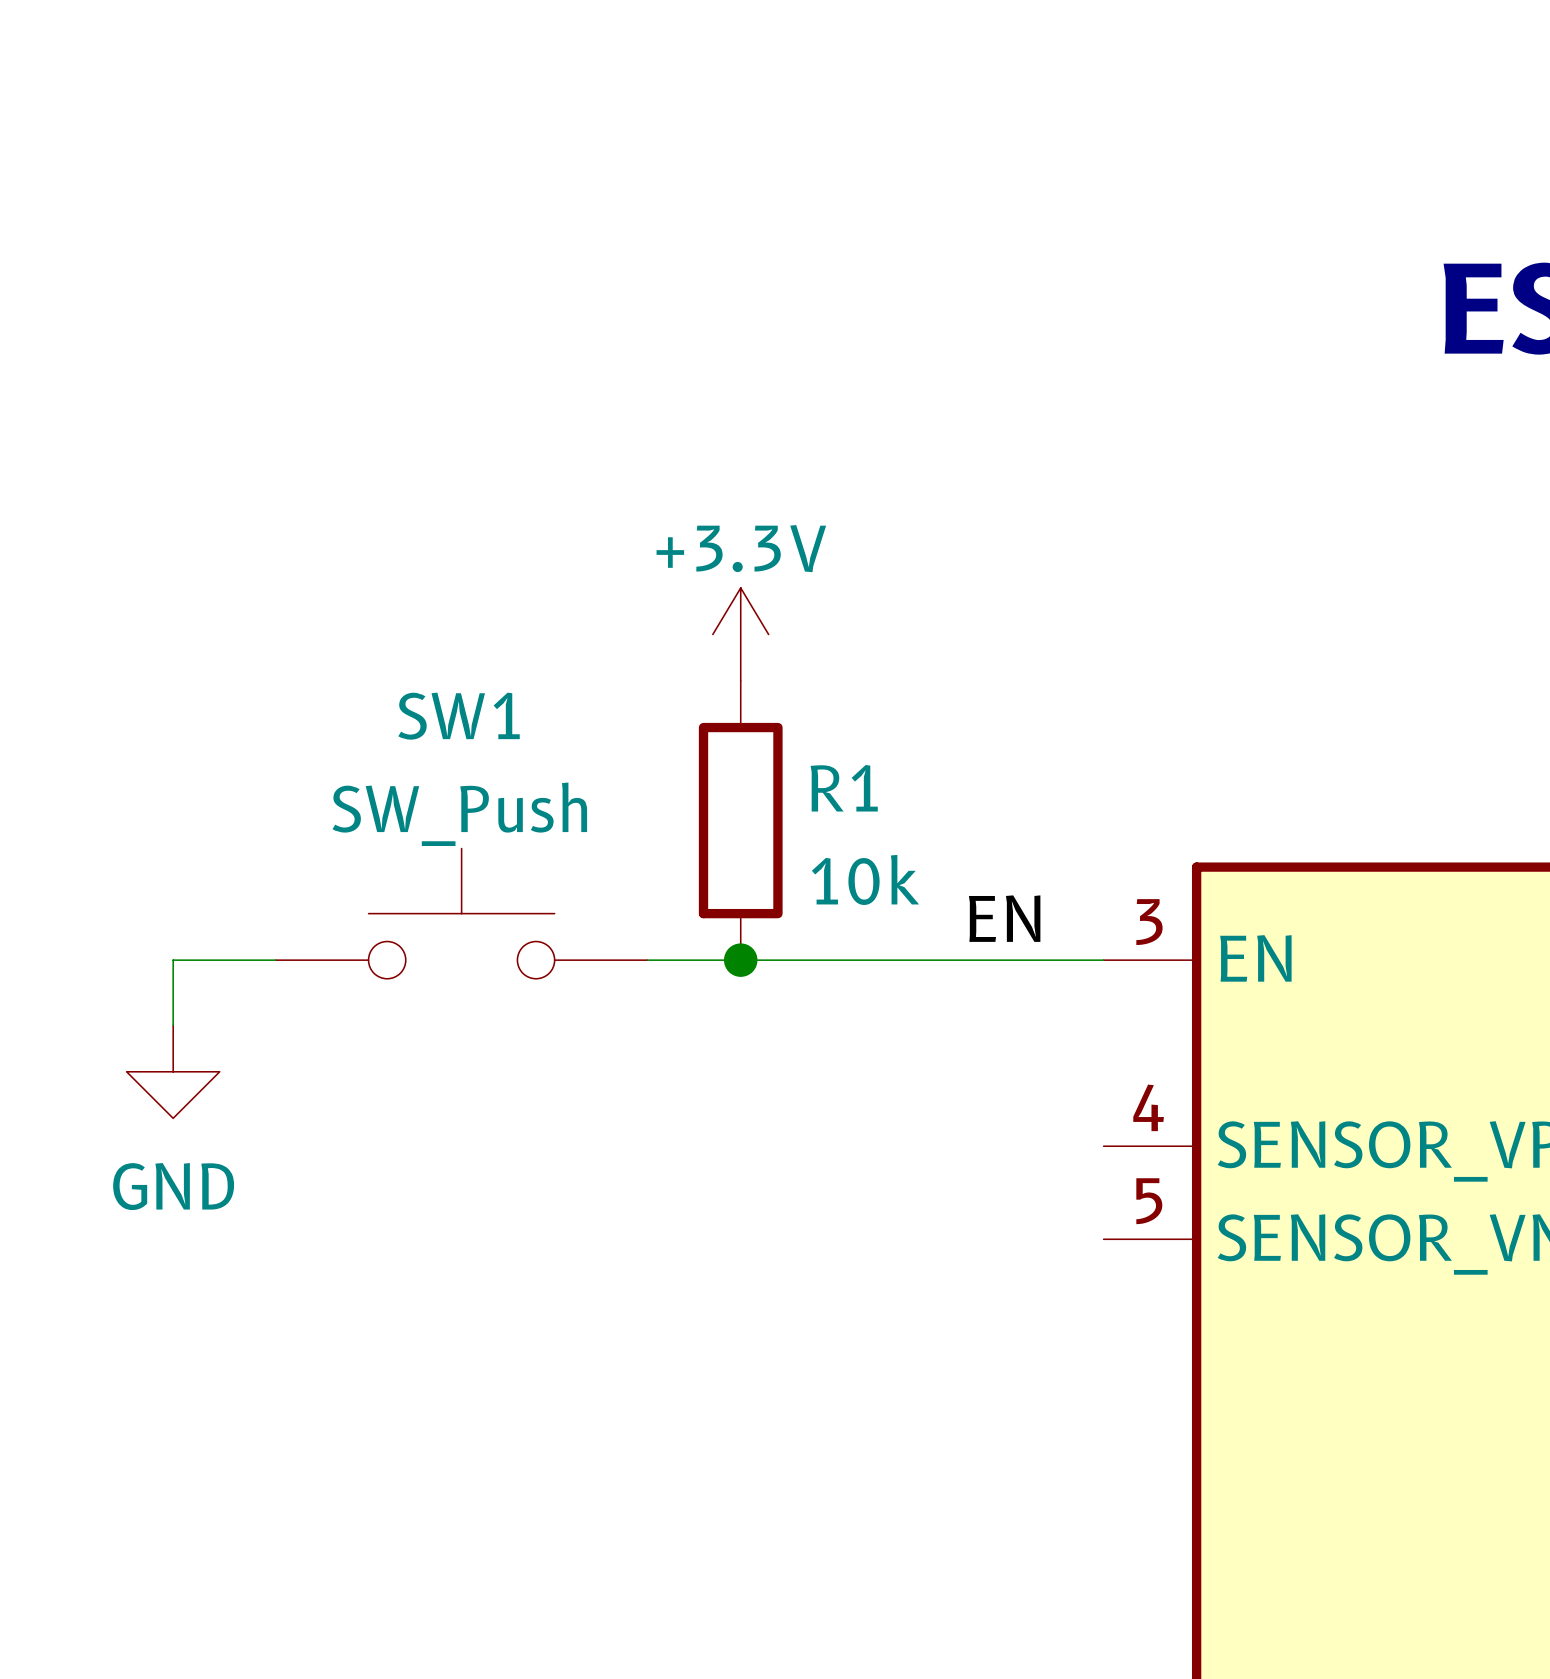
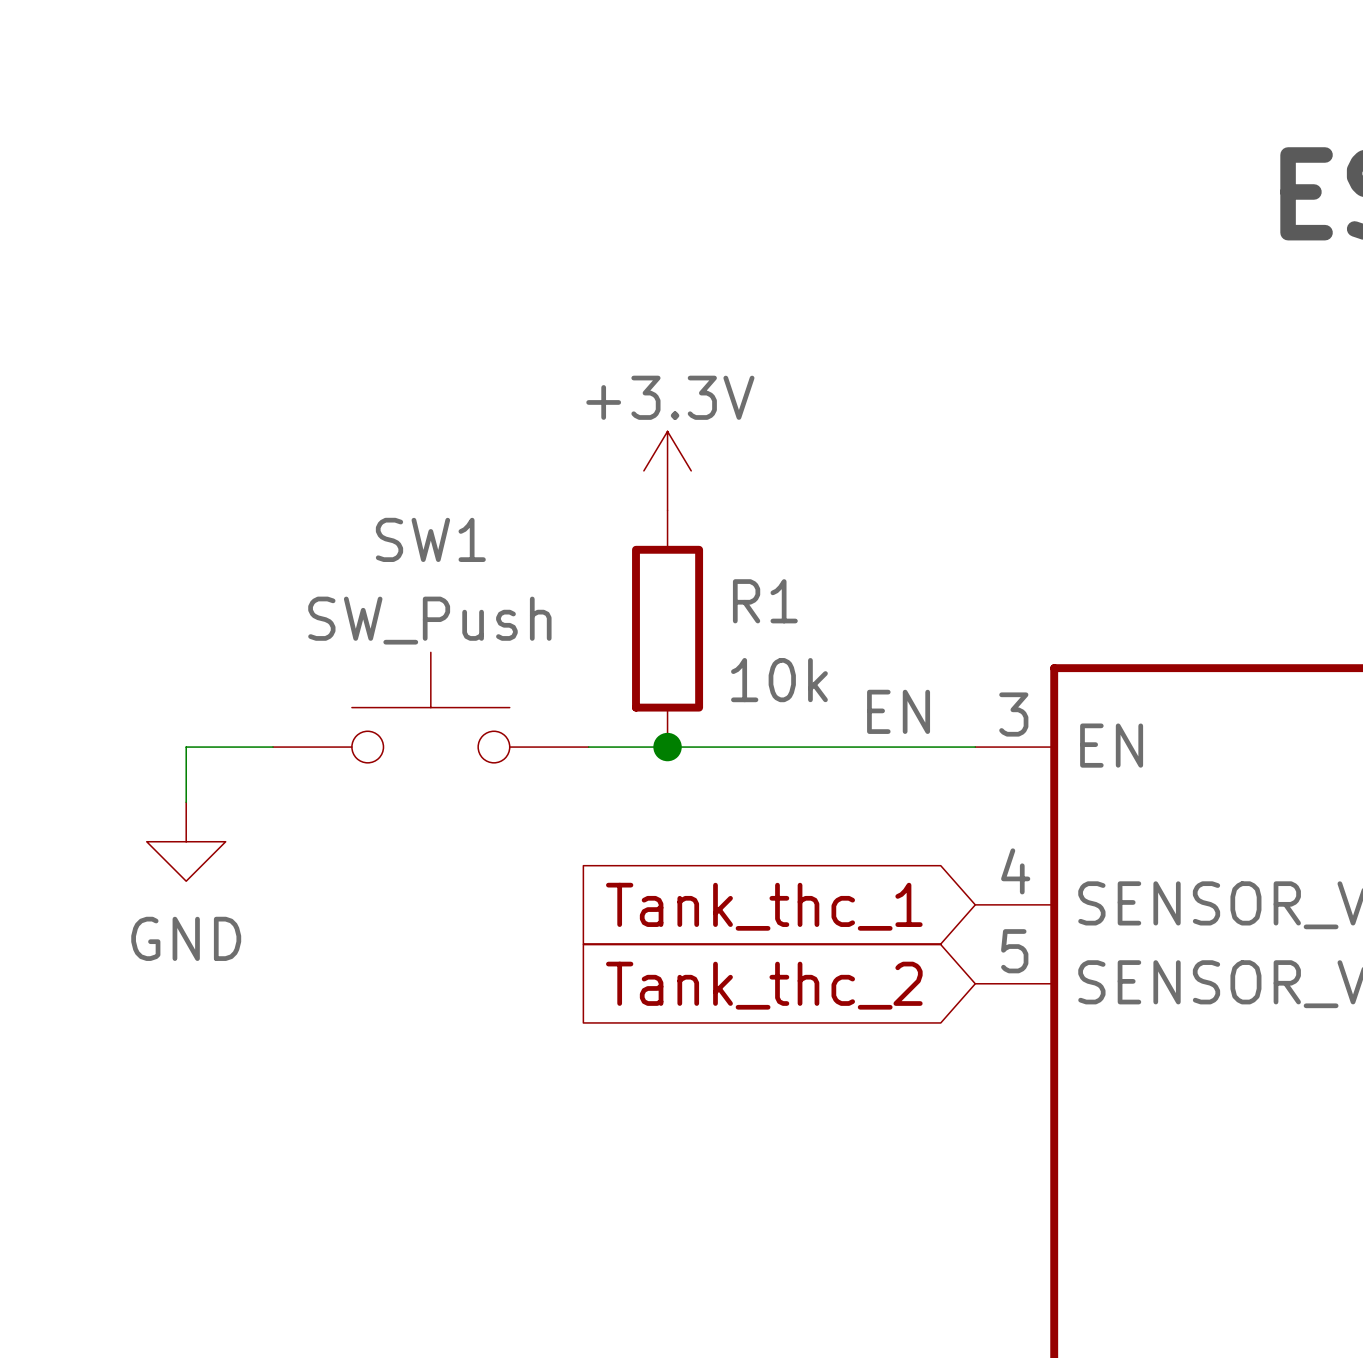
global label: none -> Tank_thc_1 (764, 906)
global label: none -> Tank_thc_2 (764, 985)

